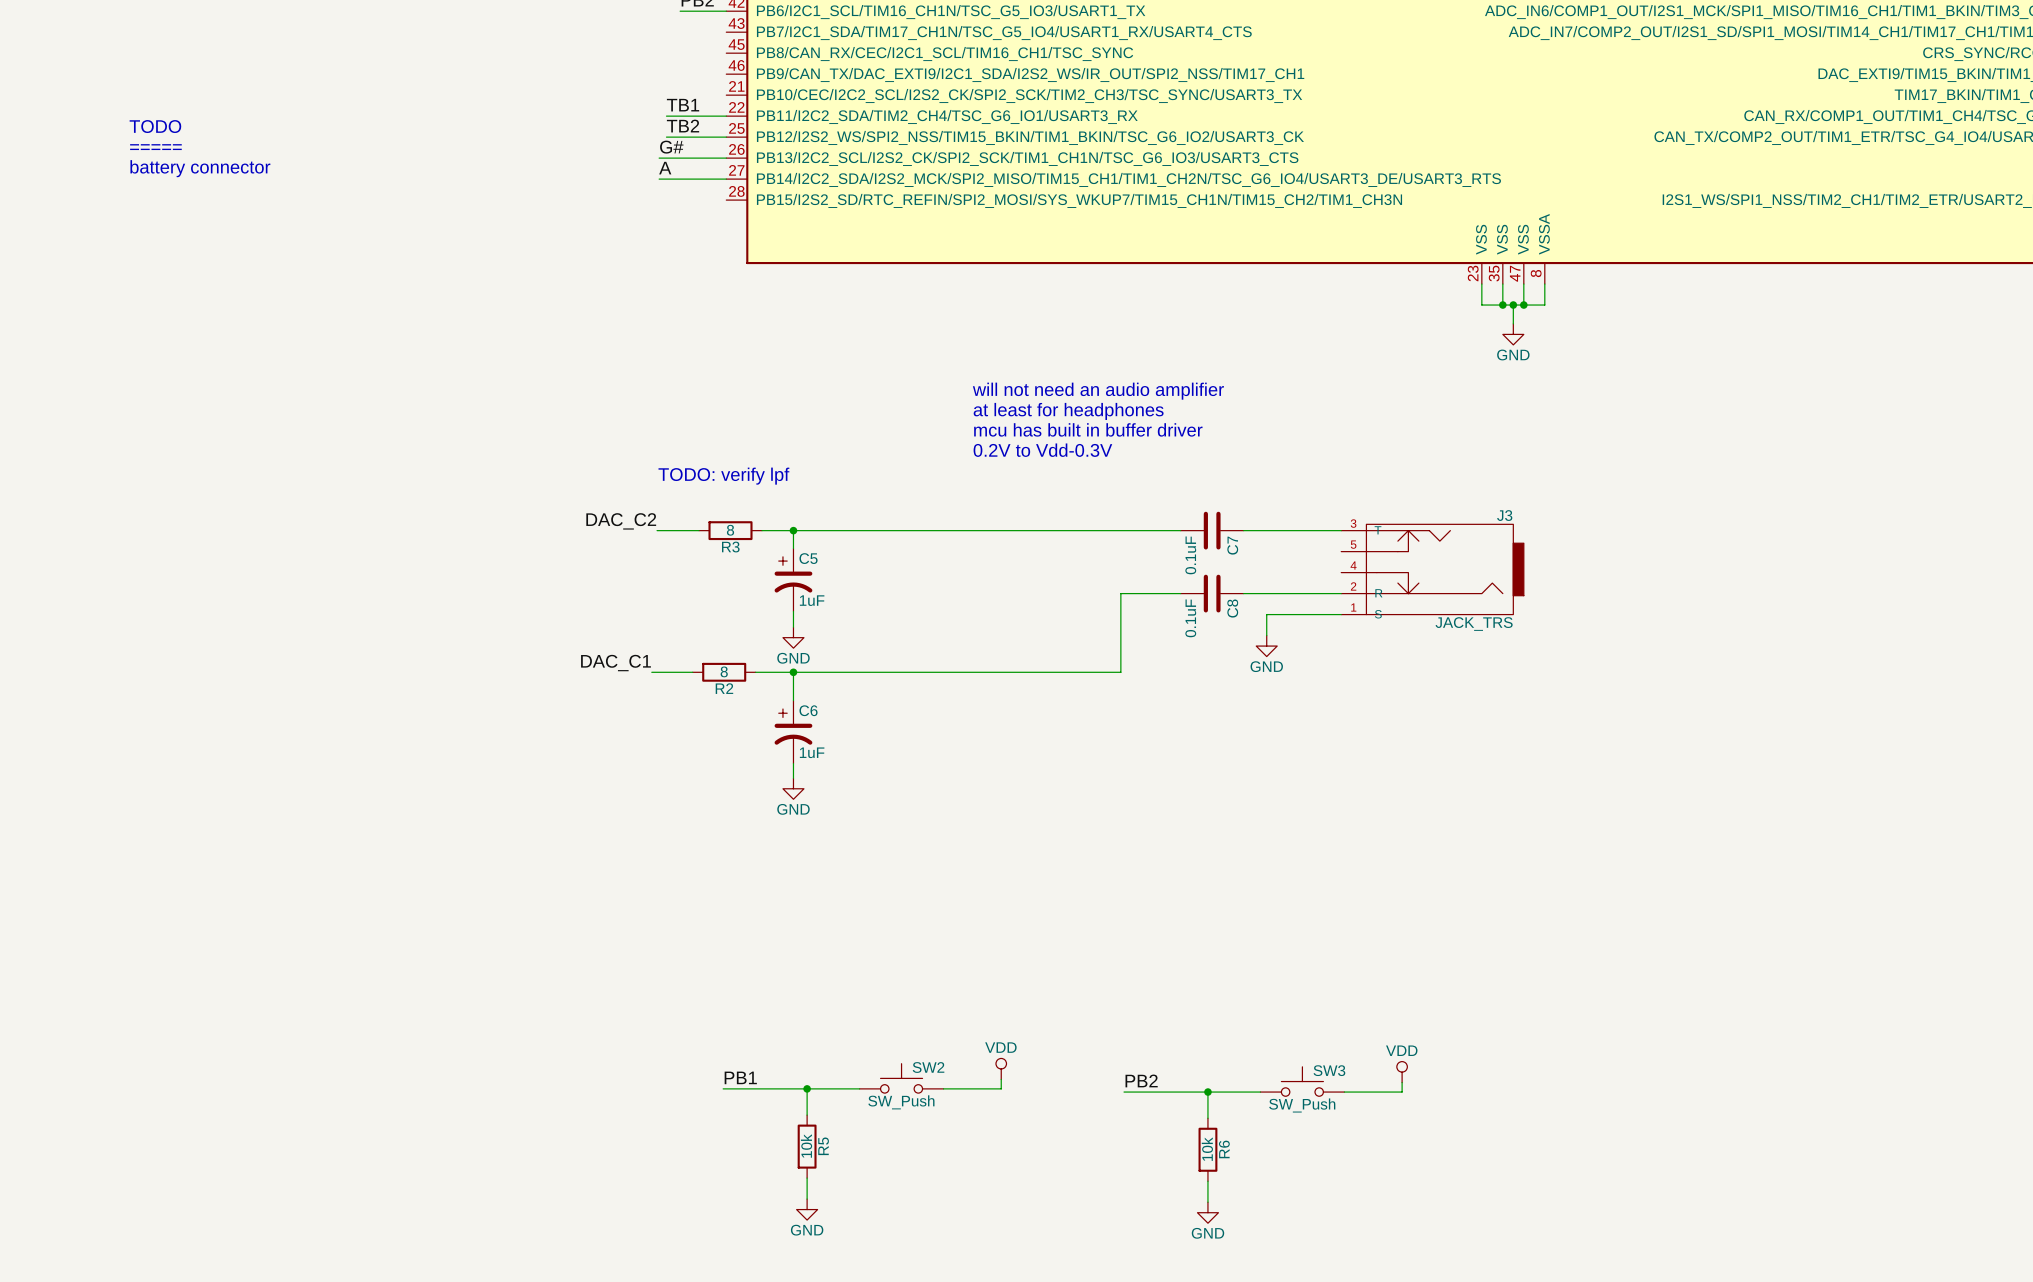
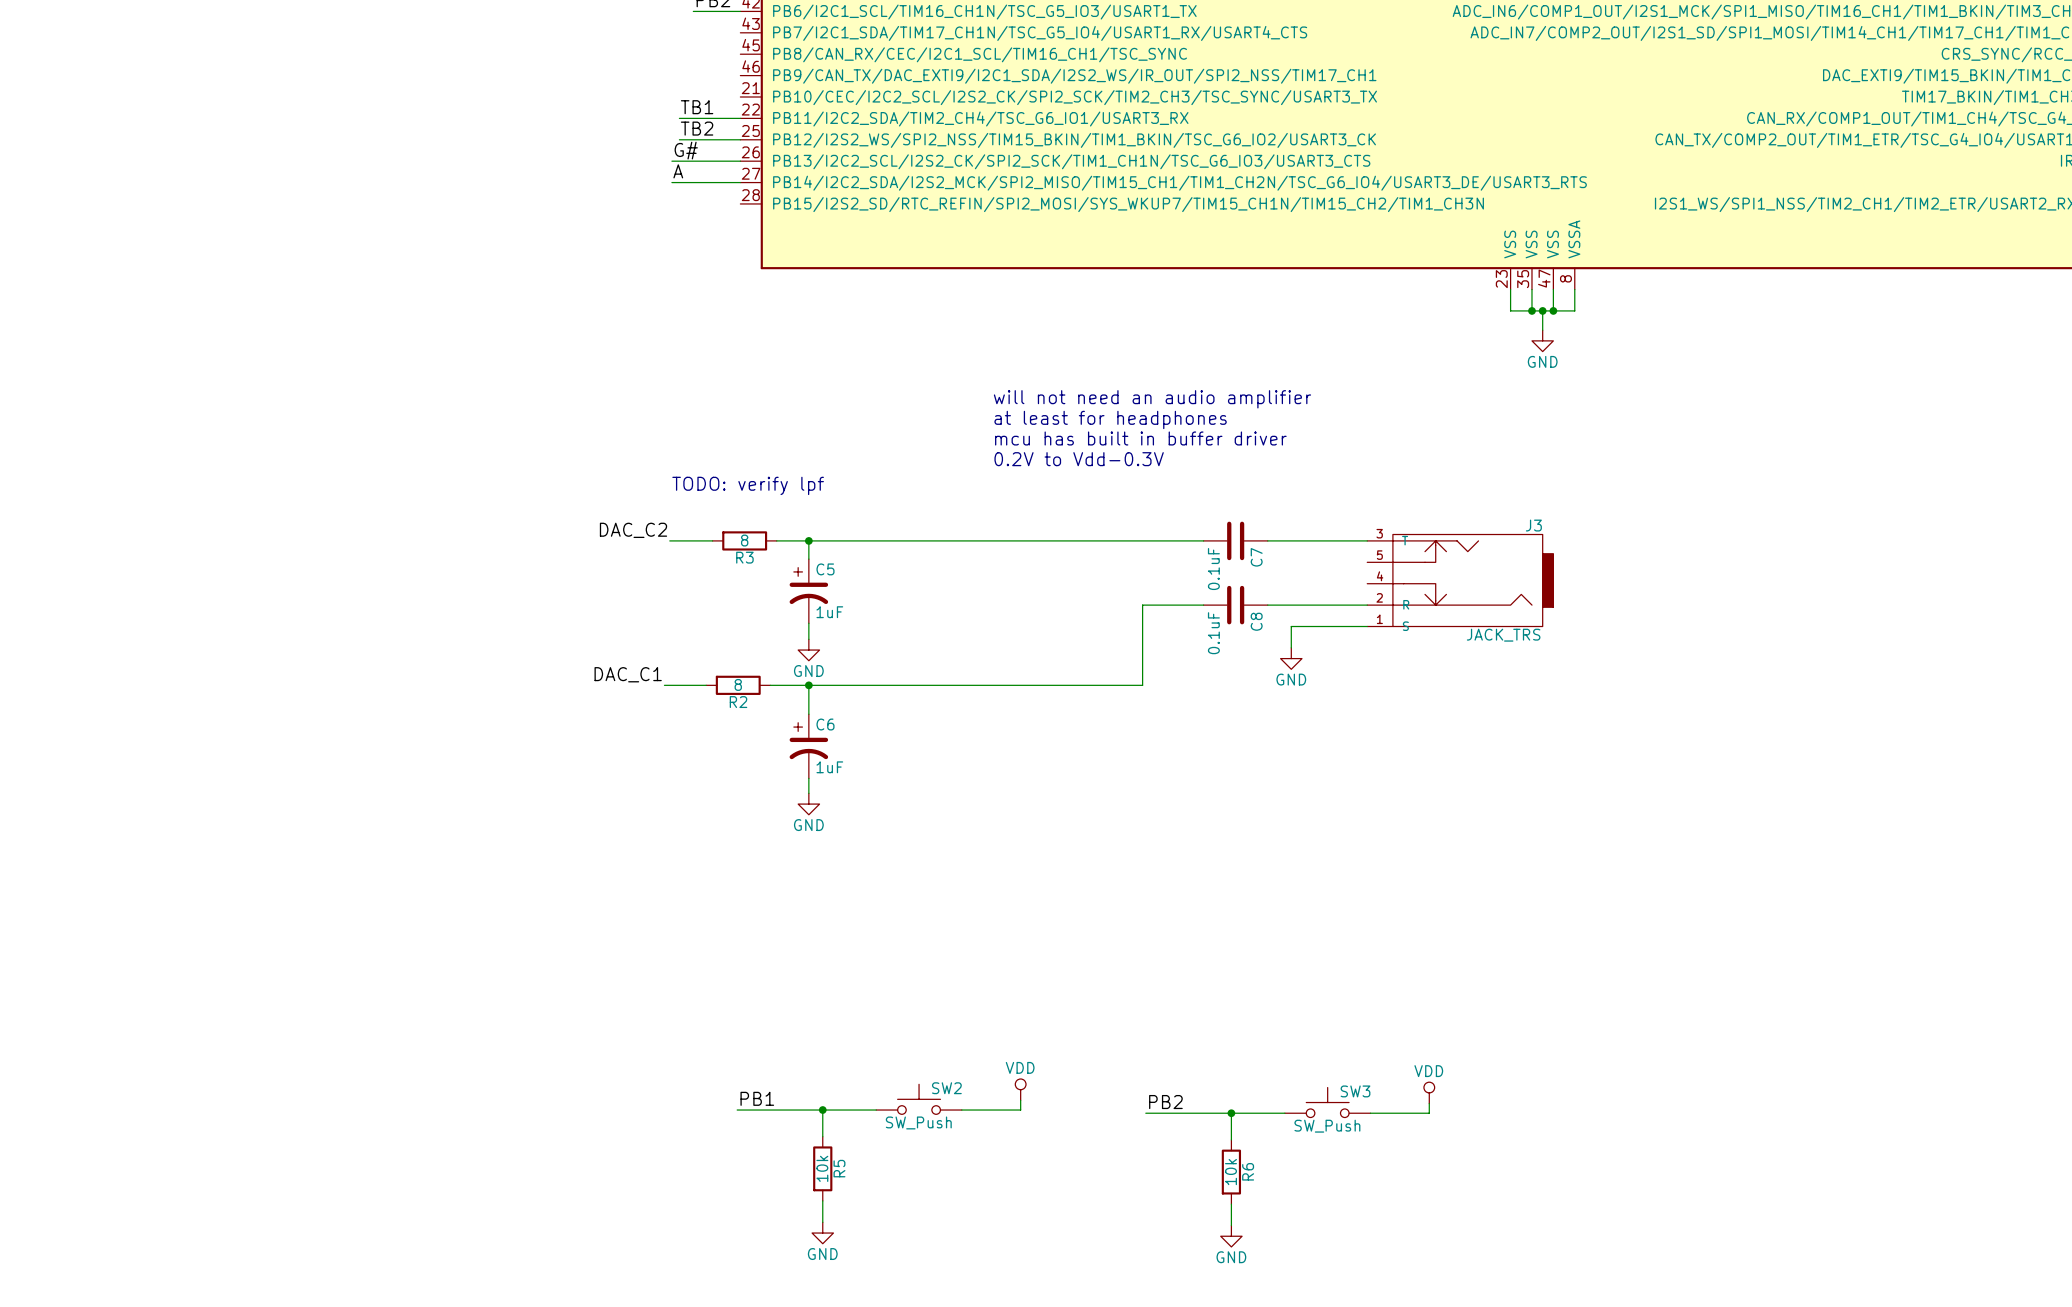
text: TODO (155, 126) -> none
text: ===== (155, 147) -> none
text: battery connector (200, 168) -> none

